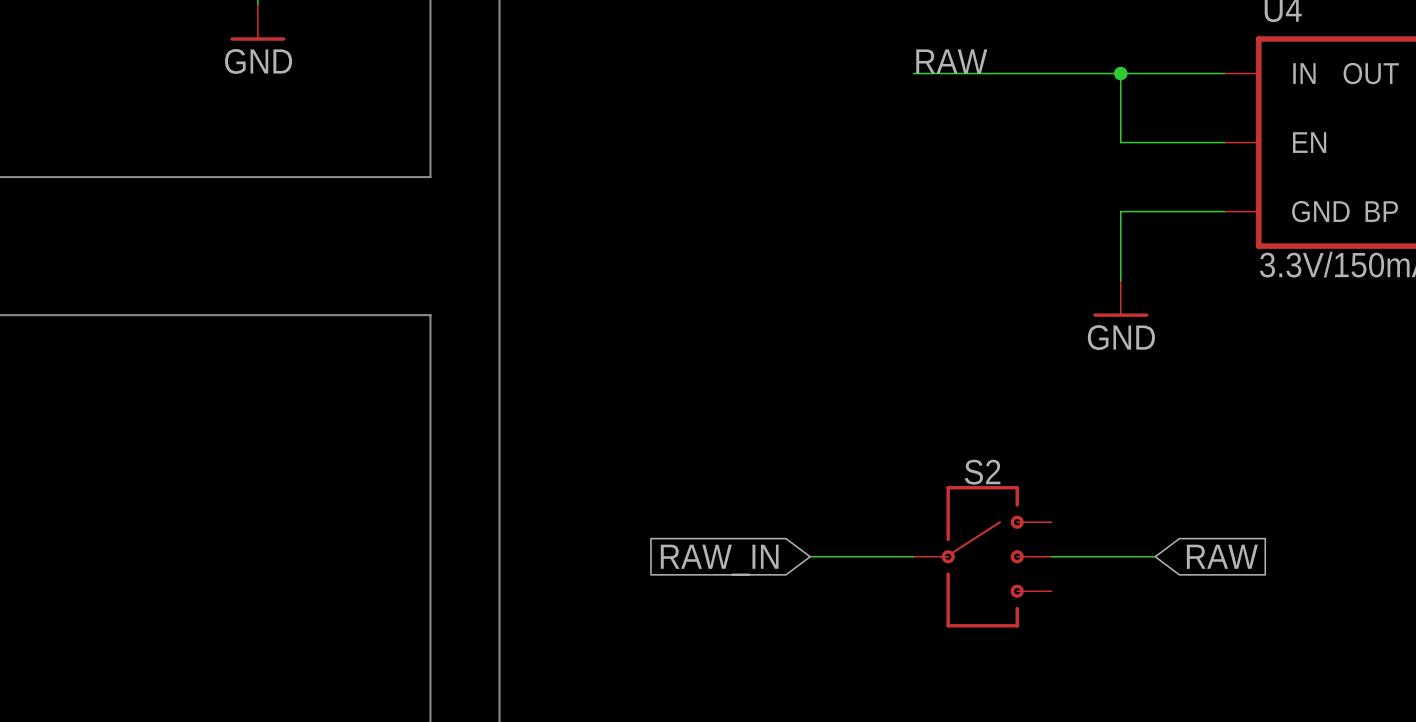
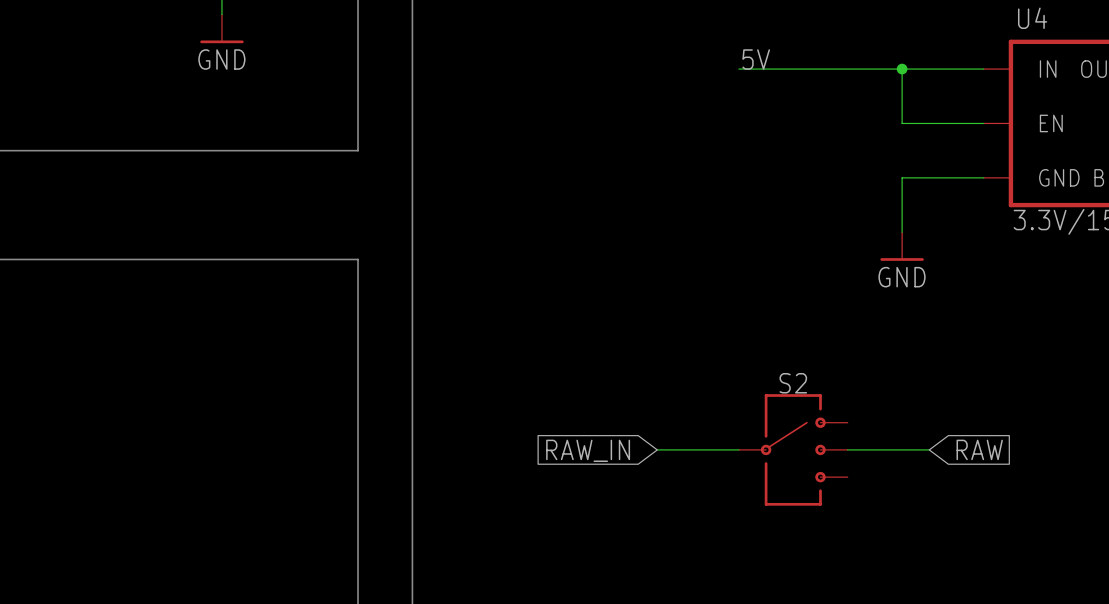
label: RAW (951, 61) -> 5V (756, 59)

